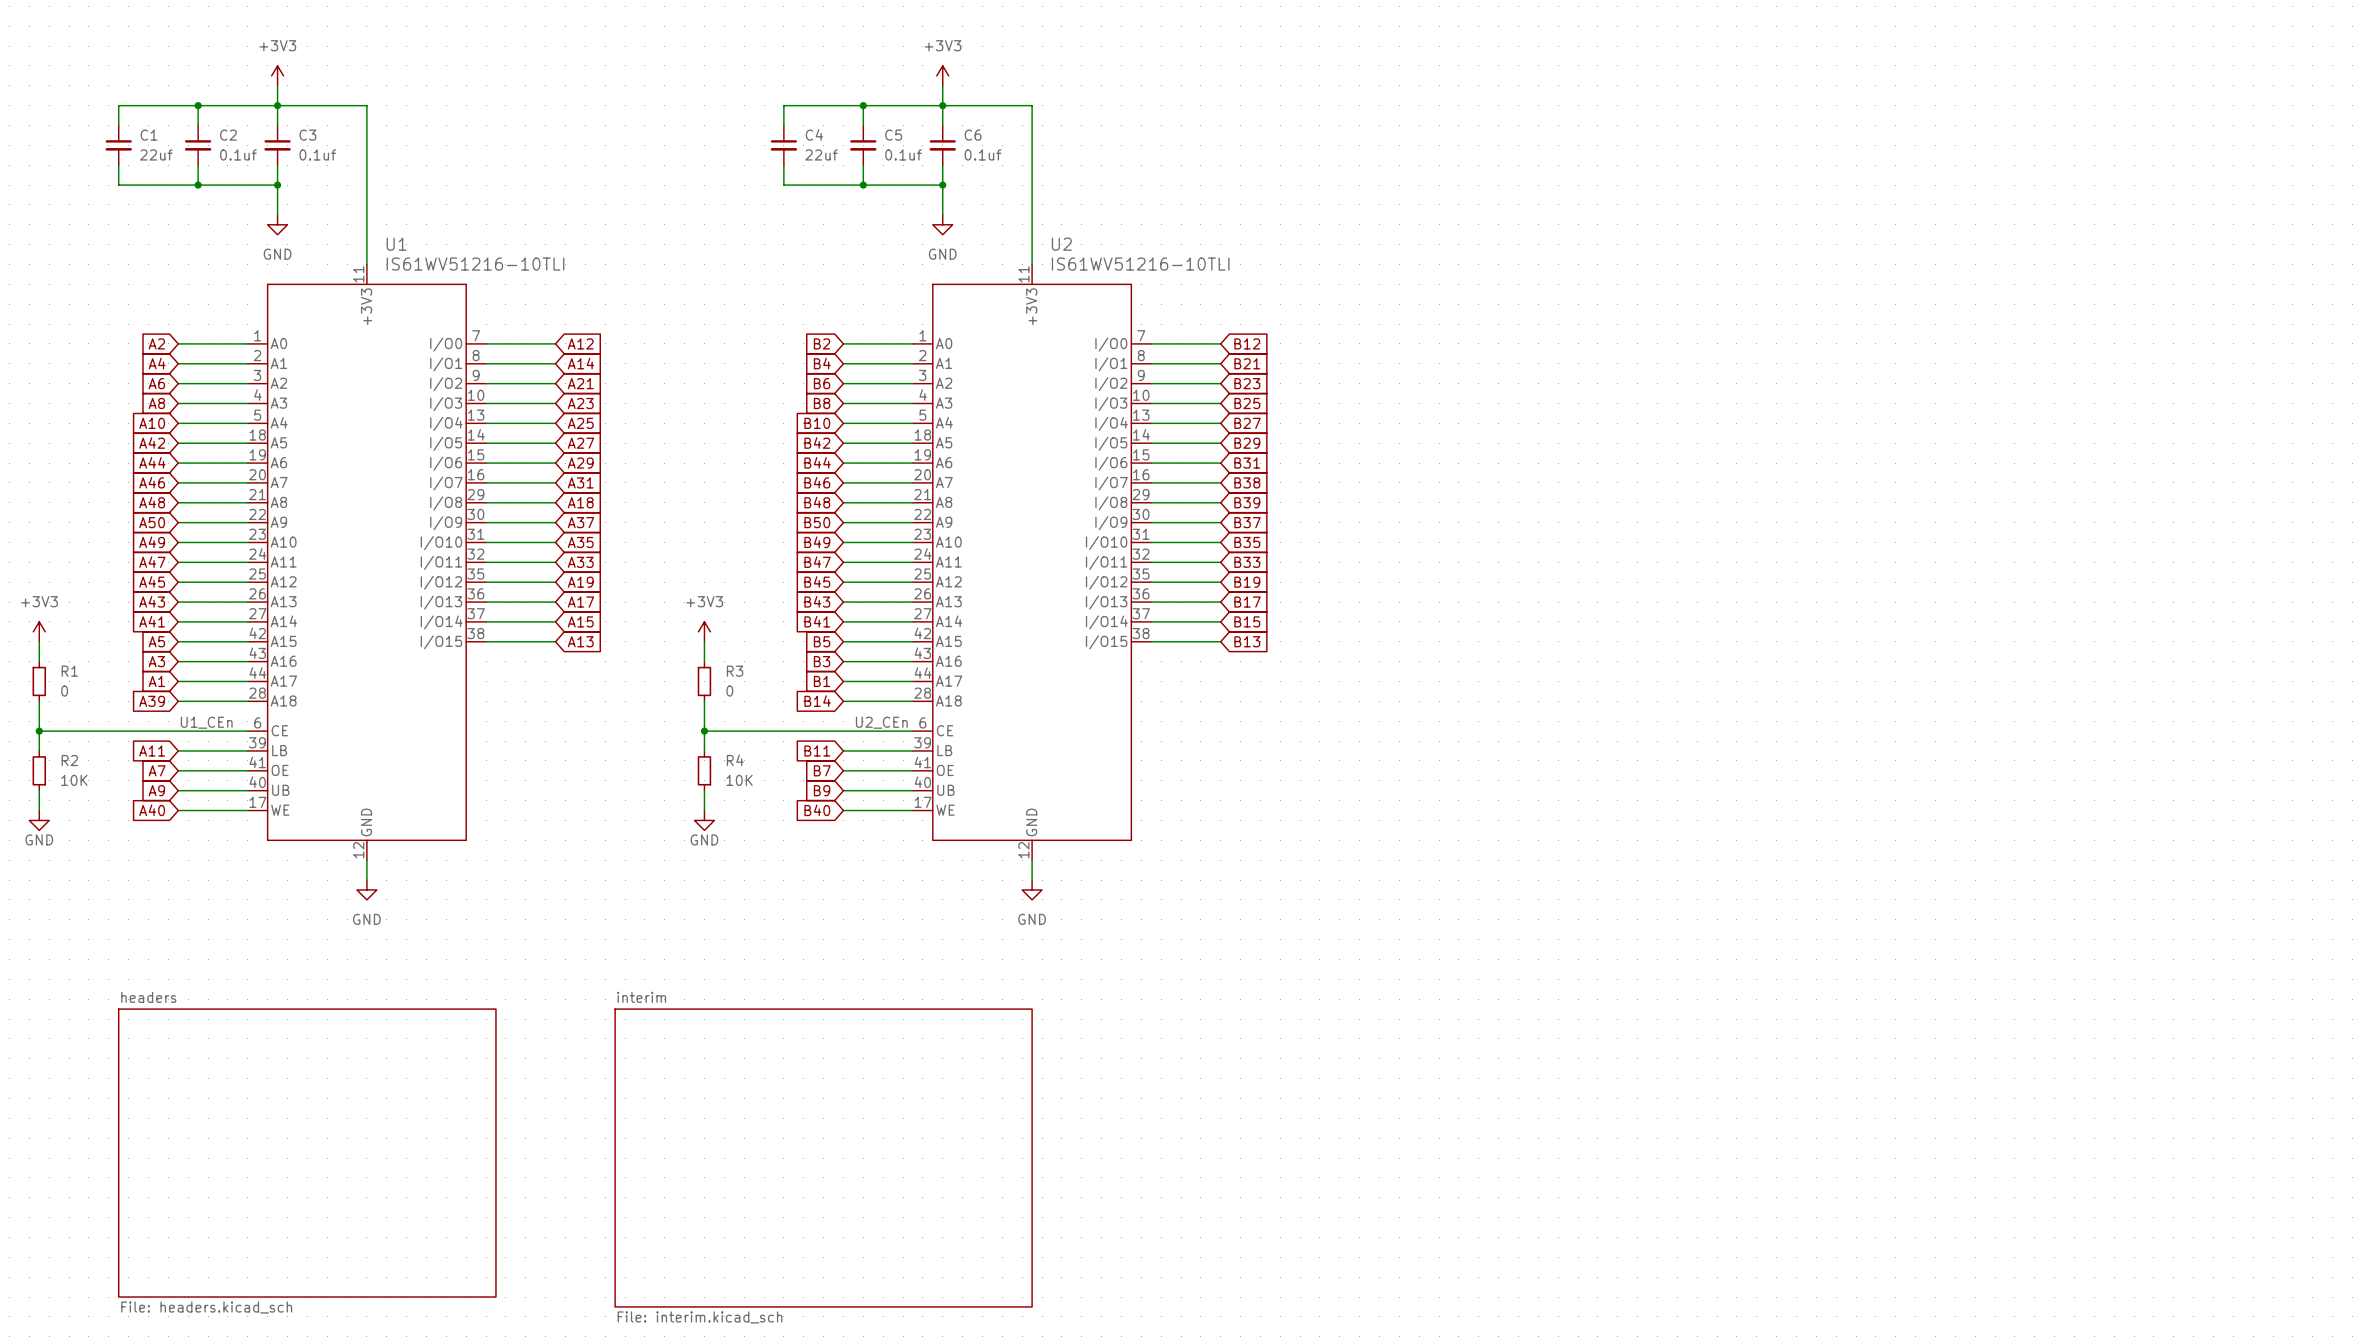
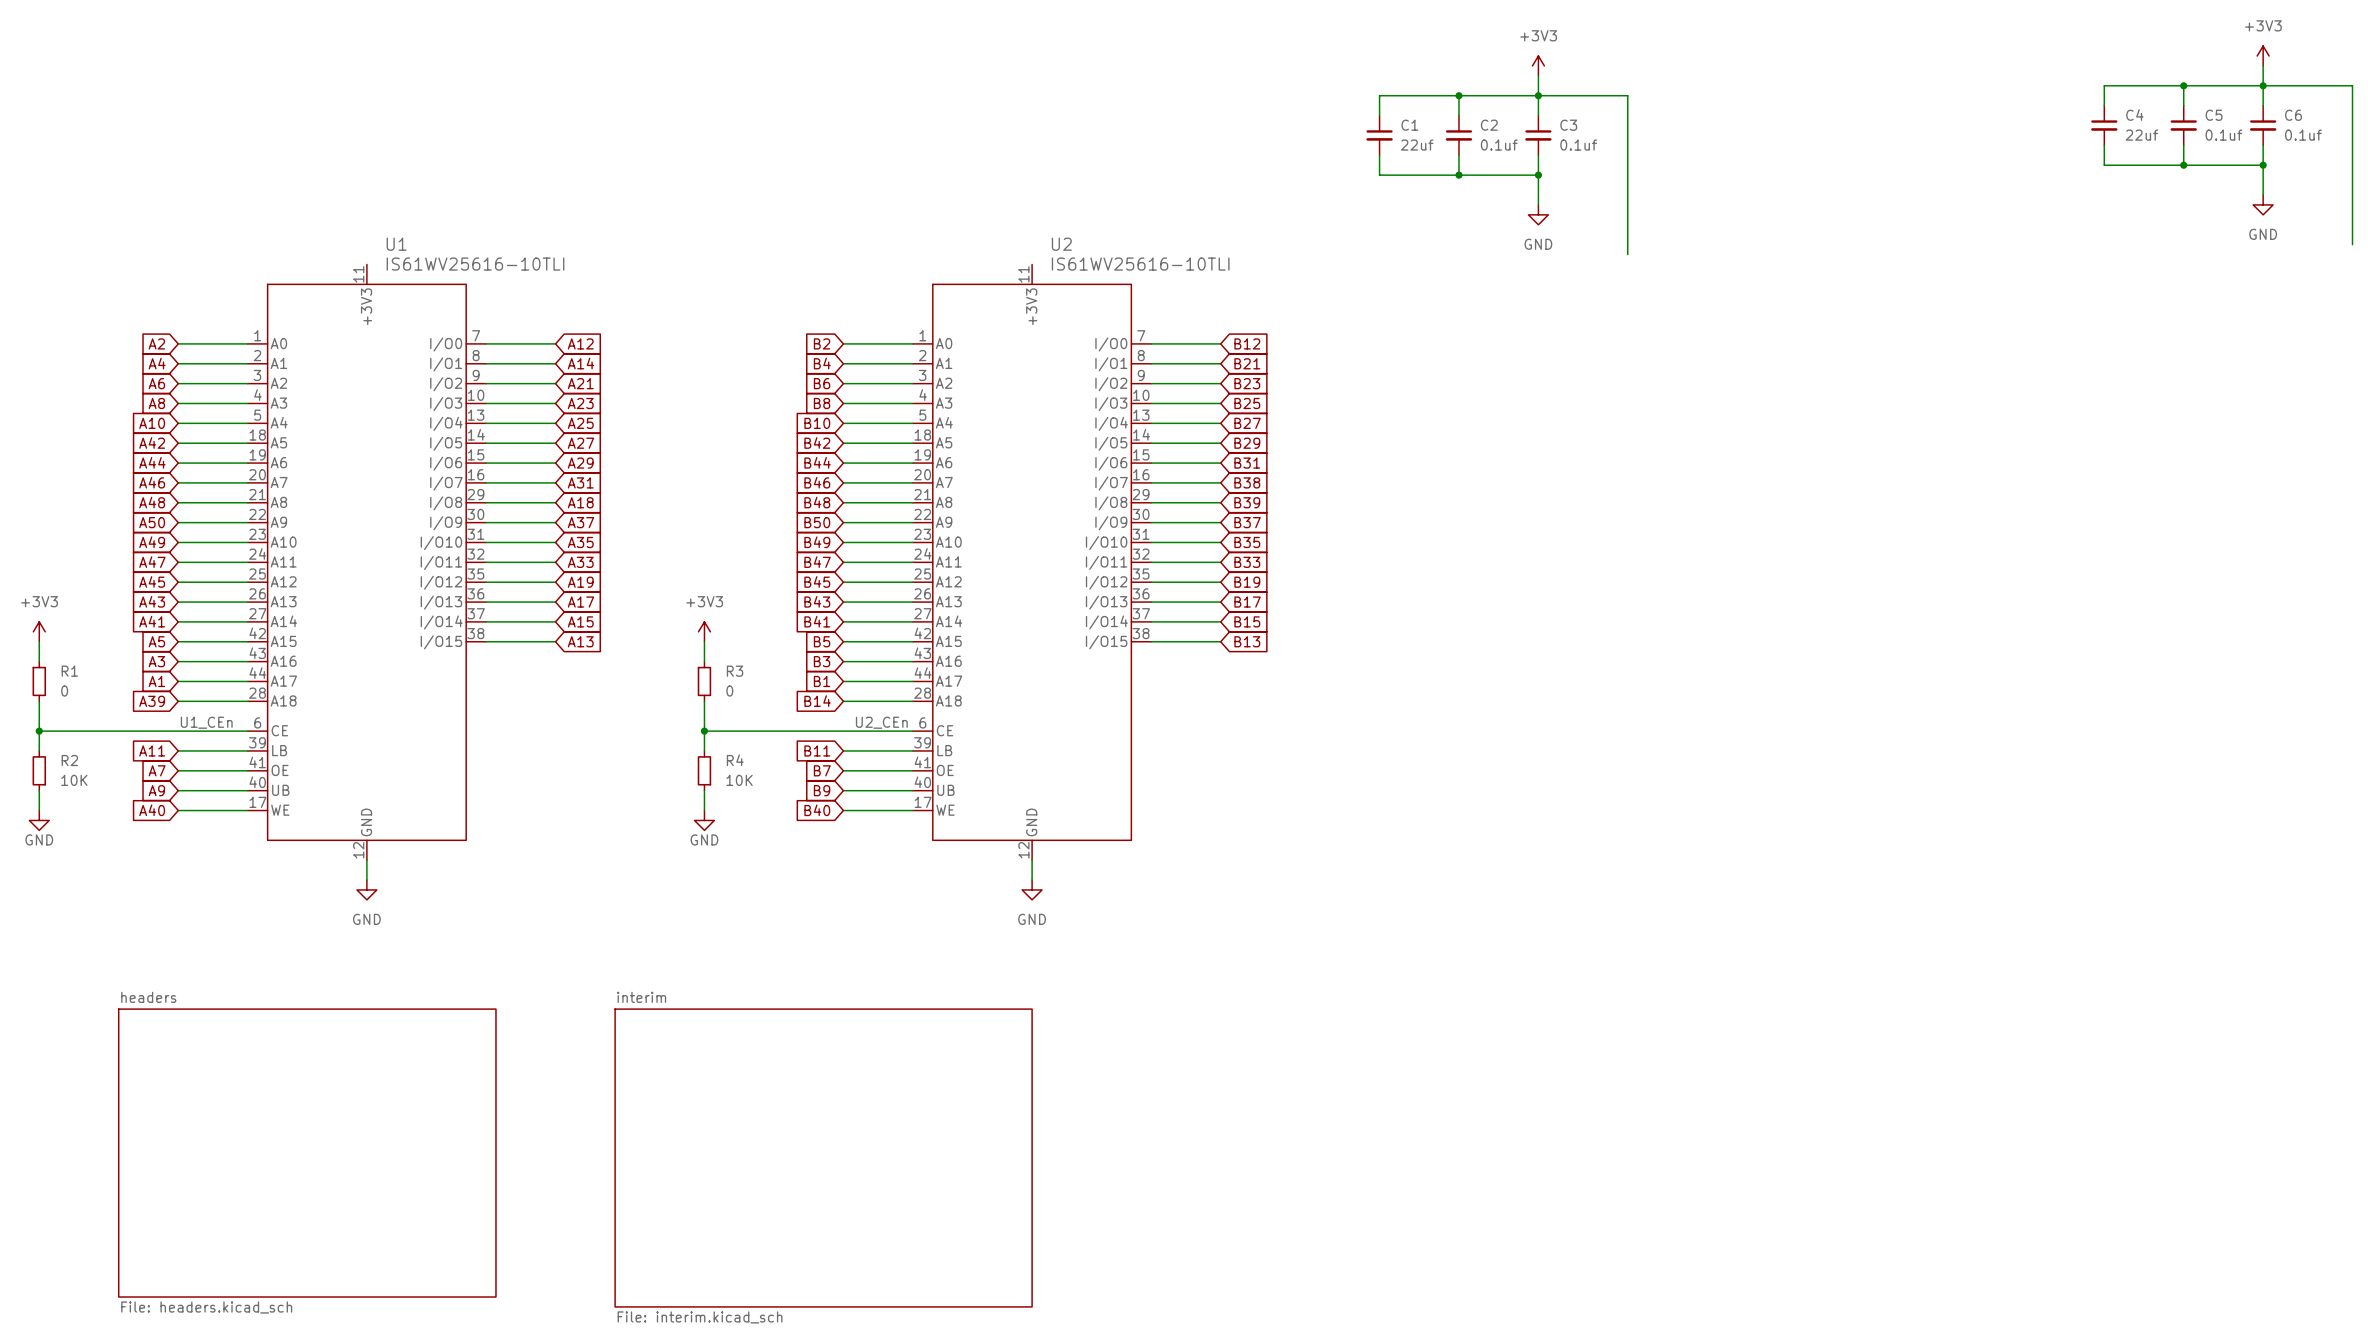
power symbol: none -> +3V3 (2263, 56)
power symbol: none -> +3V3 (1538, 65)
wire: none -> (2263, 65) (2263, 105)
power symbol: +3V3 (277, 75) -> none
power symbol: +3V3 (942, 75) -> none
wire: none -> (1538, 75) (1538, 115)
wire: (277, 85) (277, 125) -> none
wire: (942, 85) (942, 125) -> none
wire: none -> (2183, 85) (2183, 105)
junction: none -> (2183, 85)
junction: none -> (2263, 85)
wire: none -> (1458, 95) (1458, 115)
junction: none -> (1458, 95)
junction: none -> (1538, 95)
wire: (198, 105) (198, 125) -> none
junction: (198, 105) -> none
junction: (277, 105) -> none
wire: (863, 105) (863, 125) -> none
junction: (863, 105) -> none
junction: (942, 105) -> none
wire: none -> (2104, 105) (2104, 85) (2352, 85) (2352, 244)
wire: none -> (1379, 115) (1379, 95) (1627, 95) (1627, 254)
wire: (118, 125) (118, 105) (366, 105) (366, 264) -> none
wire: (783, 125) (783, 105) (1032, 105) (1032, 264) -> none
C1 position: (118, 145) -> (1379, 135)
C2 position: (198, 145) -> (1458, 135)
C3 position: (277, 145) -> (1538, 135)
C4 position: (783, 145) -> (2104, 125)
C5 position: (863, 145) -> (2183, 125)
C6 position: (942, 145) -> (2263, 125)
wire: none -> (2104, 145) (2104, 165) (2263, 165)
wire: none -> (2183, 145) (2183, 165)
wire: none -> (2263, 145) (2263, 195)
wire: none -> (1379, 155) (1379, 175) (1538, 175)
wire: none -> (1458, 155) (1458, 175)
wire: none -> (1538, 155) (1538, 204)
wire: (118, 165) (118, 185) (277, 185) -> none
wire: (198, 165) (198, 185) -> none
wire: (277, 165) (277, 214) -> none
wire: (783, 165) (783, 185) (942, 185) -> none
wire: (863, 165) (863, 185) -> none
wire: (942, 165) (942, 214) -> none
junction: none -> (2183, 165)
junction: none -> (2263, 165)
junction: none -> (1458, 175)
junction: none -> (1538, 175)
junction: (198, 185) -> none
junction: (277, 185) -> none
junction: (863, 185) -> none
junction: (942, 185) -> none
power symbol: none -> GND (2263, 204)
power symbol: none -> GND (1538, 214)
power symbol: GND (277, 224) -> none
power symbol: GND (942, 224) -> none
U1 value: IS61WV51216-10TLI (475, 264) -> IS61WV25616-10TLI (475, 264)
U2 value: IS61WV51216-10TLI (1140, 264) -> IS61WV25616-10TLI (1140, 264)

